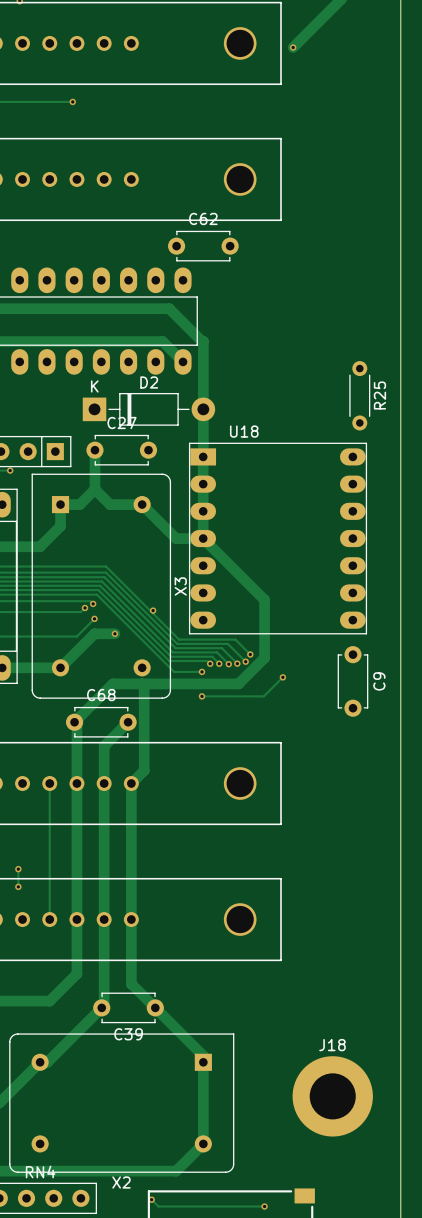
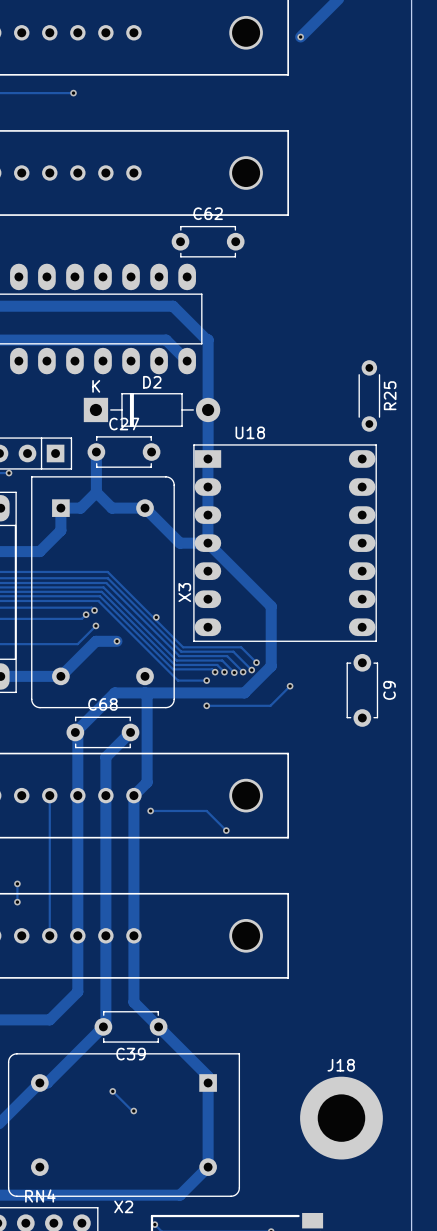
track: none -> (150, 810) (206, 810) (226, 830)
via: none -> (150, 810)
via: none -> (226, 830)
track: none -> (112, 1091) (133, 1111)
via: none -> (112, 1091)
via: none -> (133, 1111)

